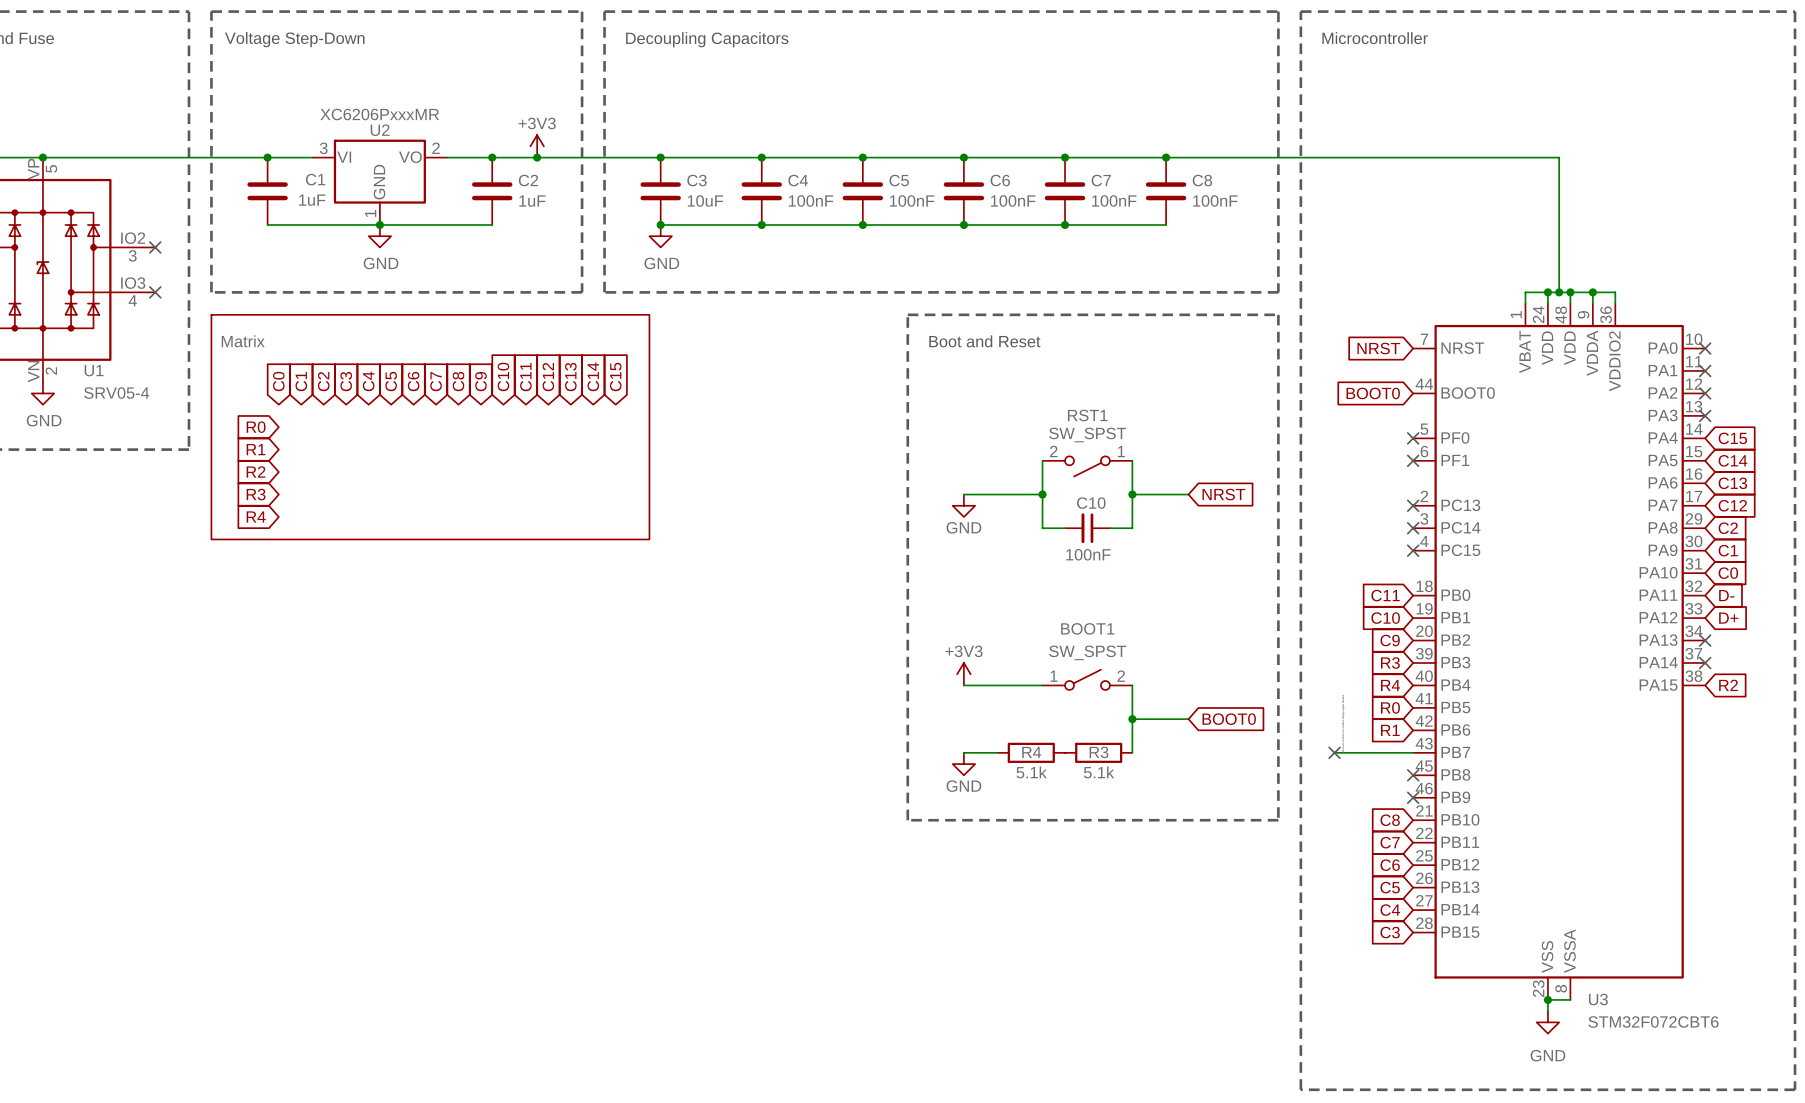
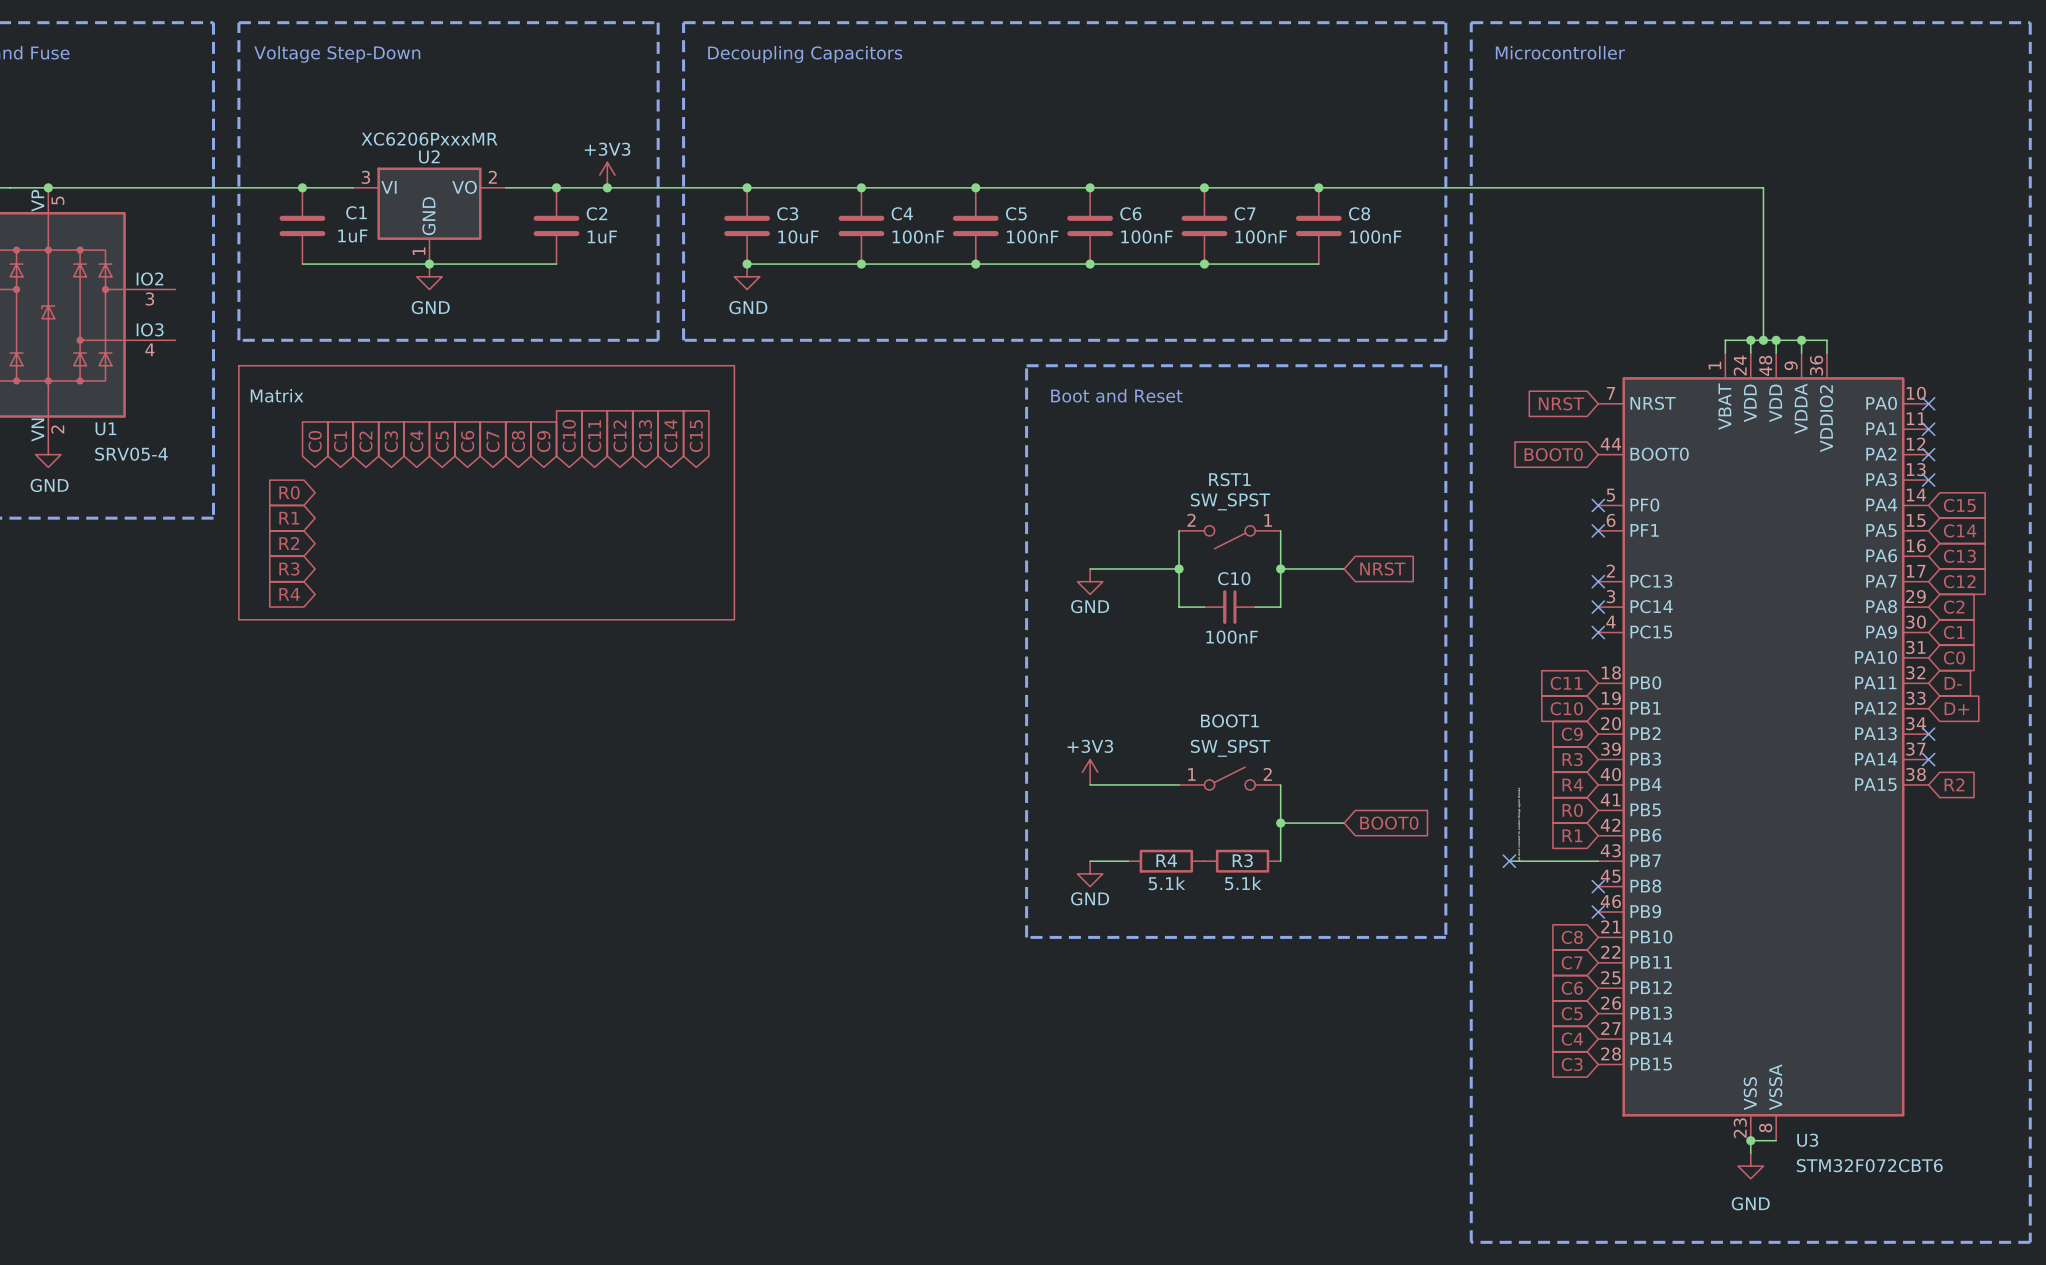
no-connect mark: (155, 247) -> none
no-connect mark: (155, 292) -> none

